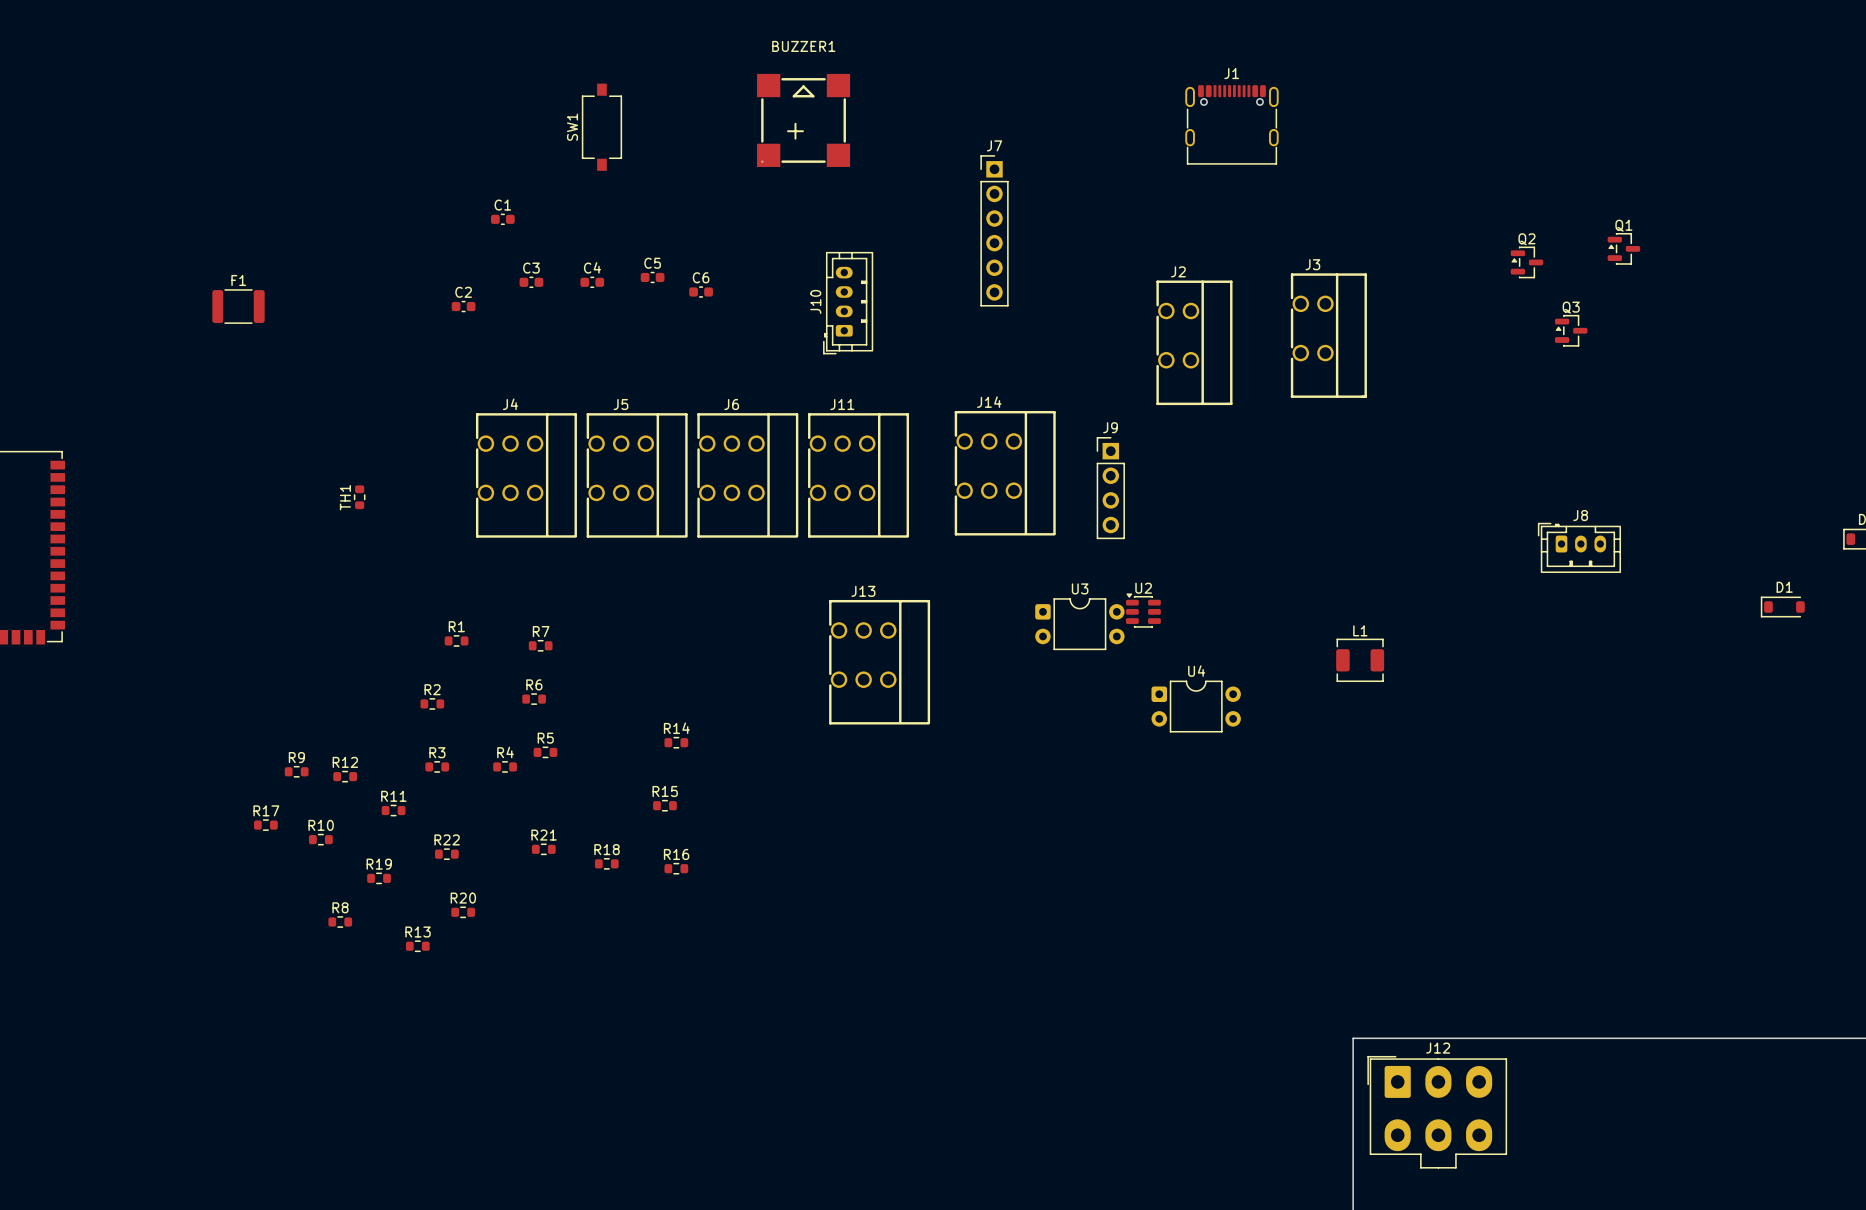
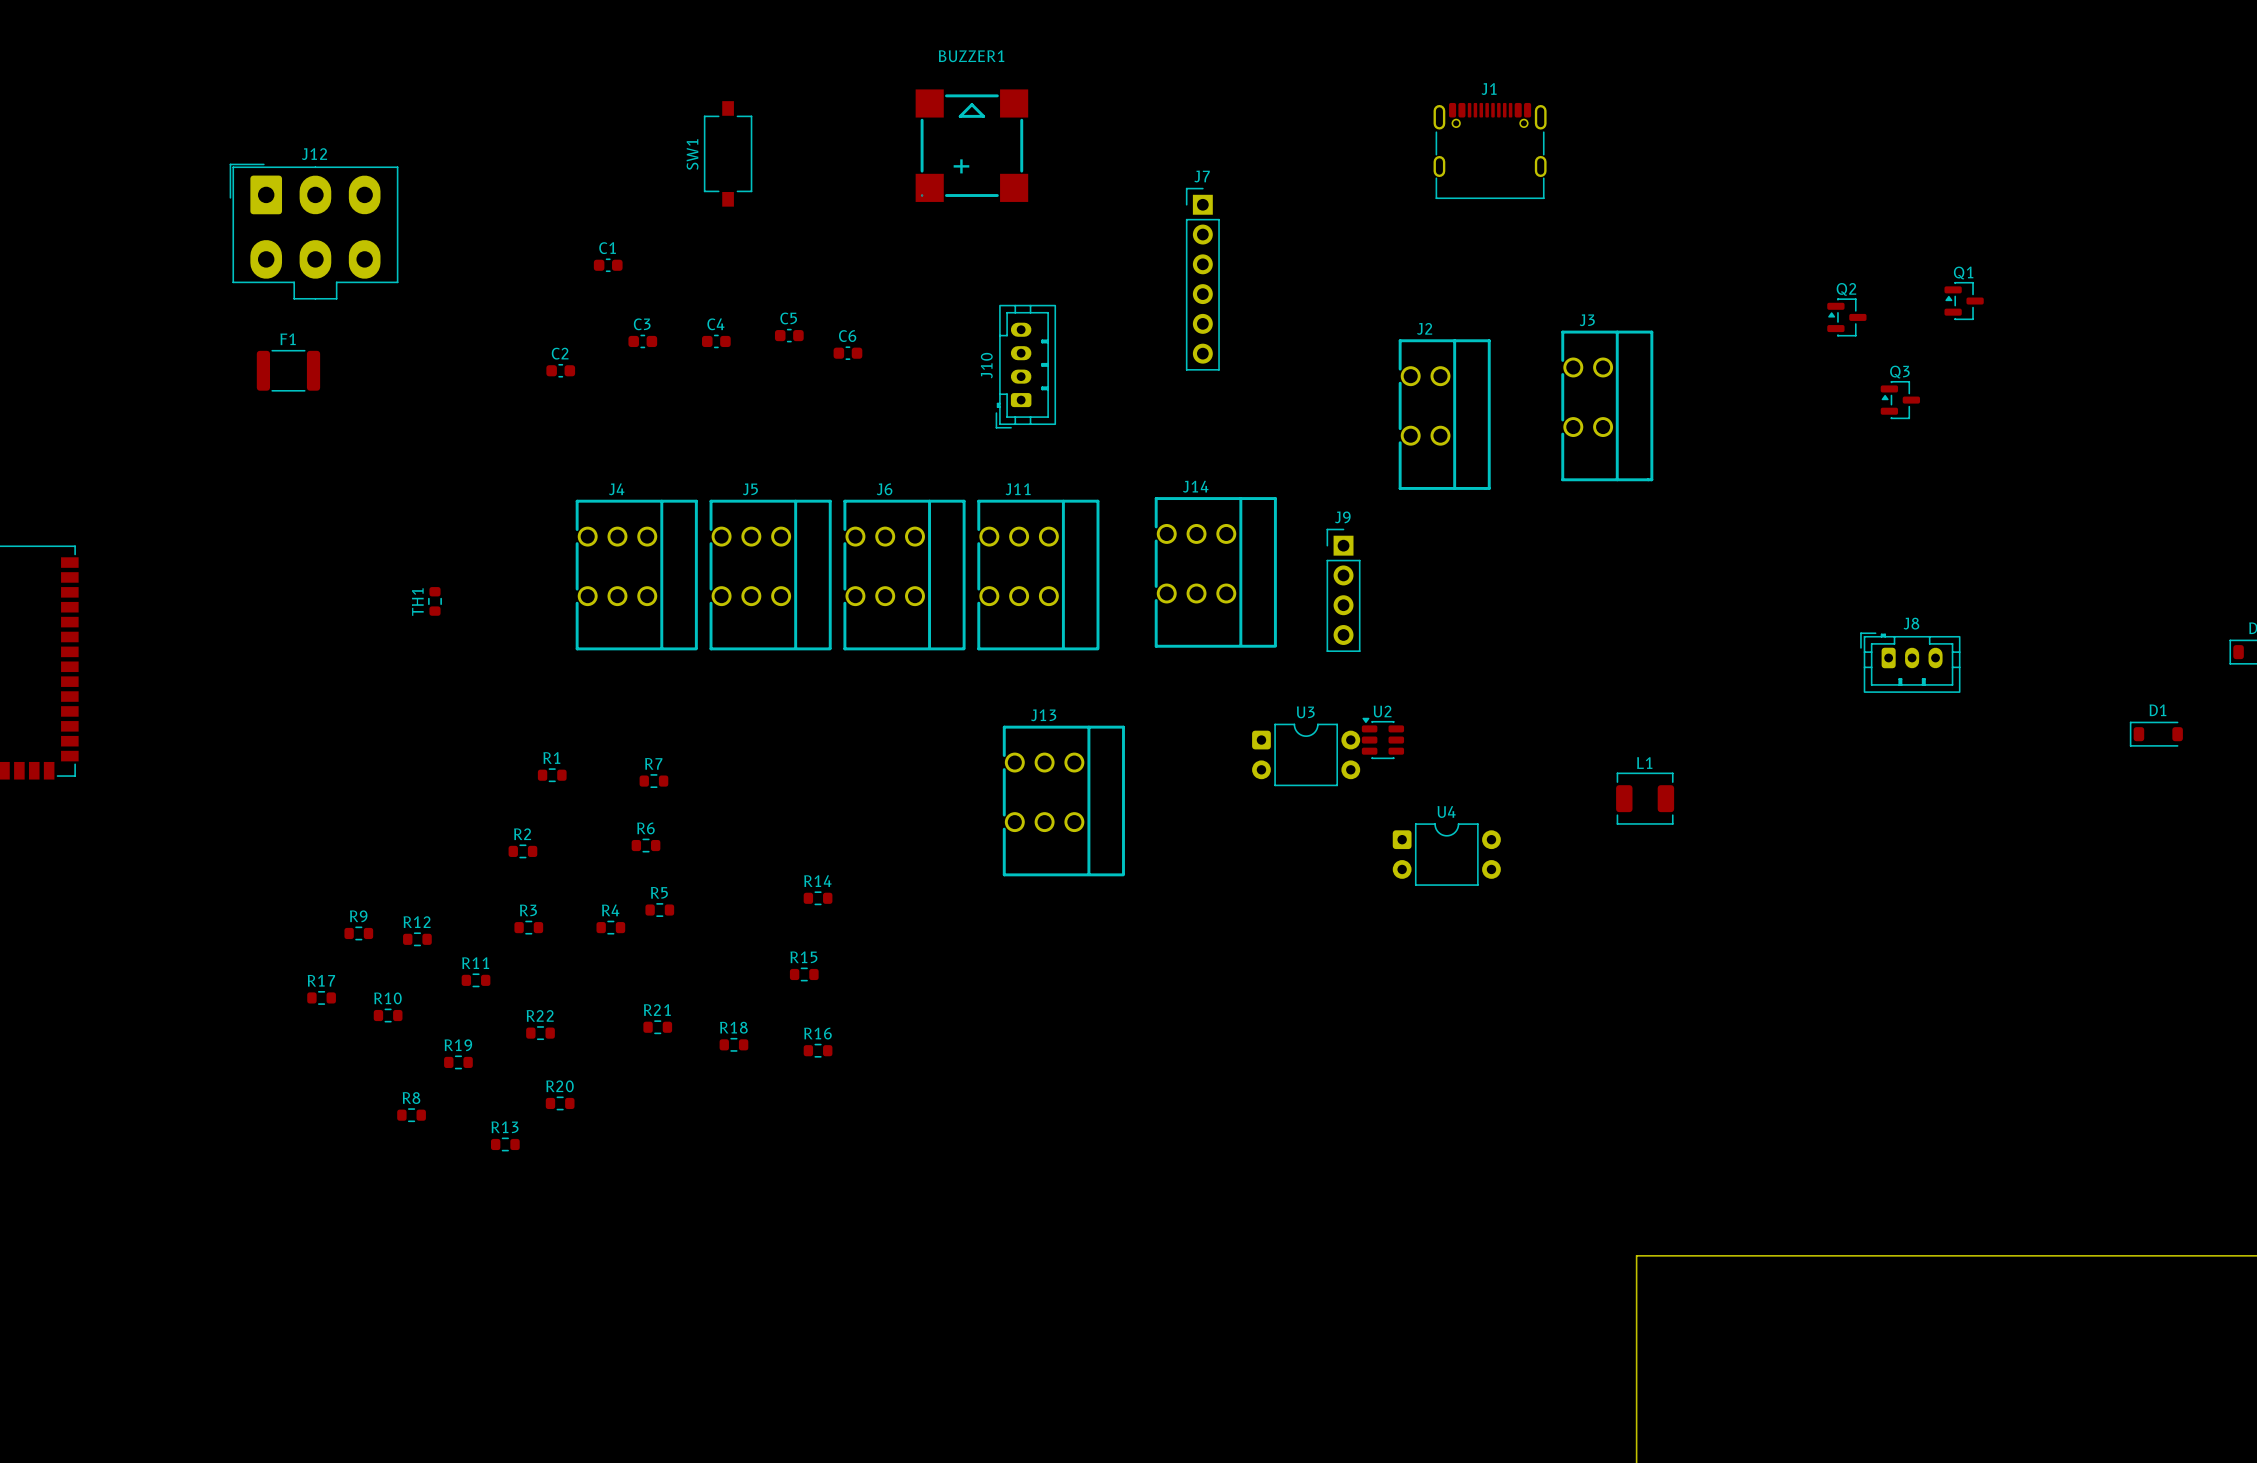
J12 position: (1437, 1112) -> (314, 231)

